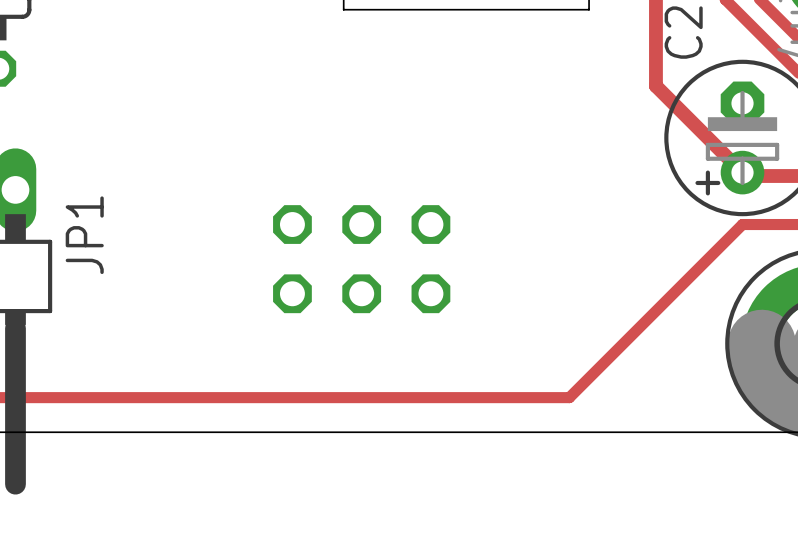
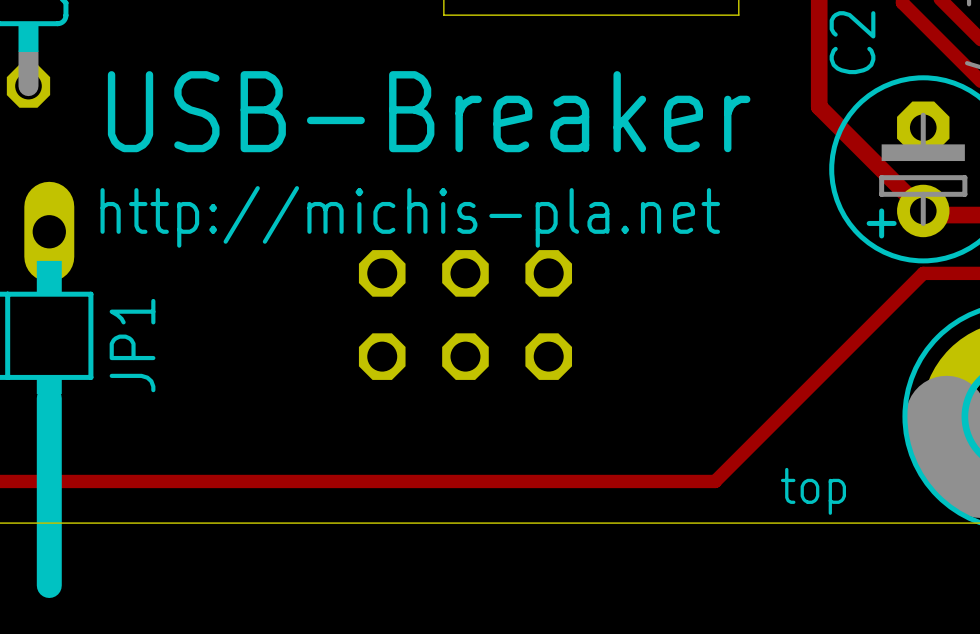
text: none -> USB-Breaker (429, 111)
text: none -> http://michis-pla.net (410, 216)
JP1 name position: JP1 (84, 235) -> JP1 (132, 345)
text: none -> top (813, 491)

